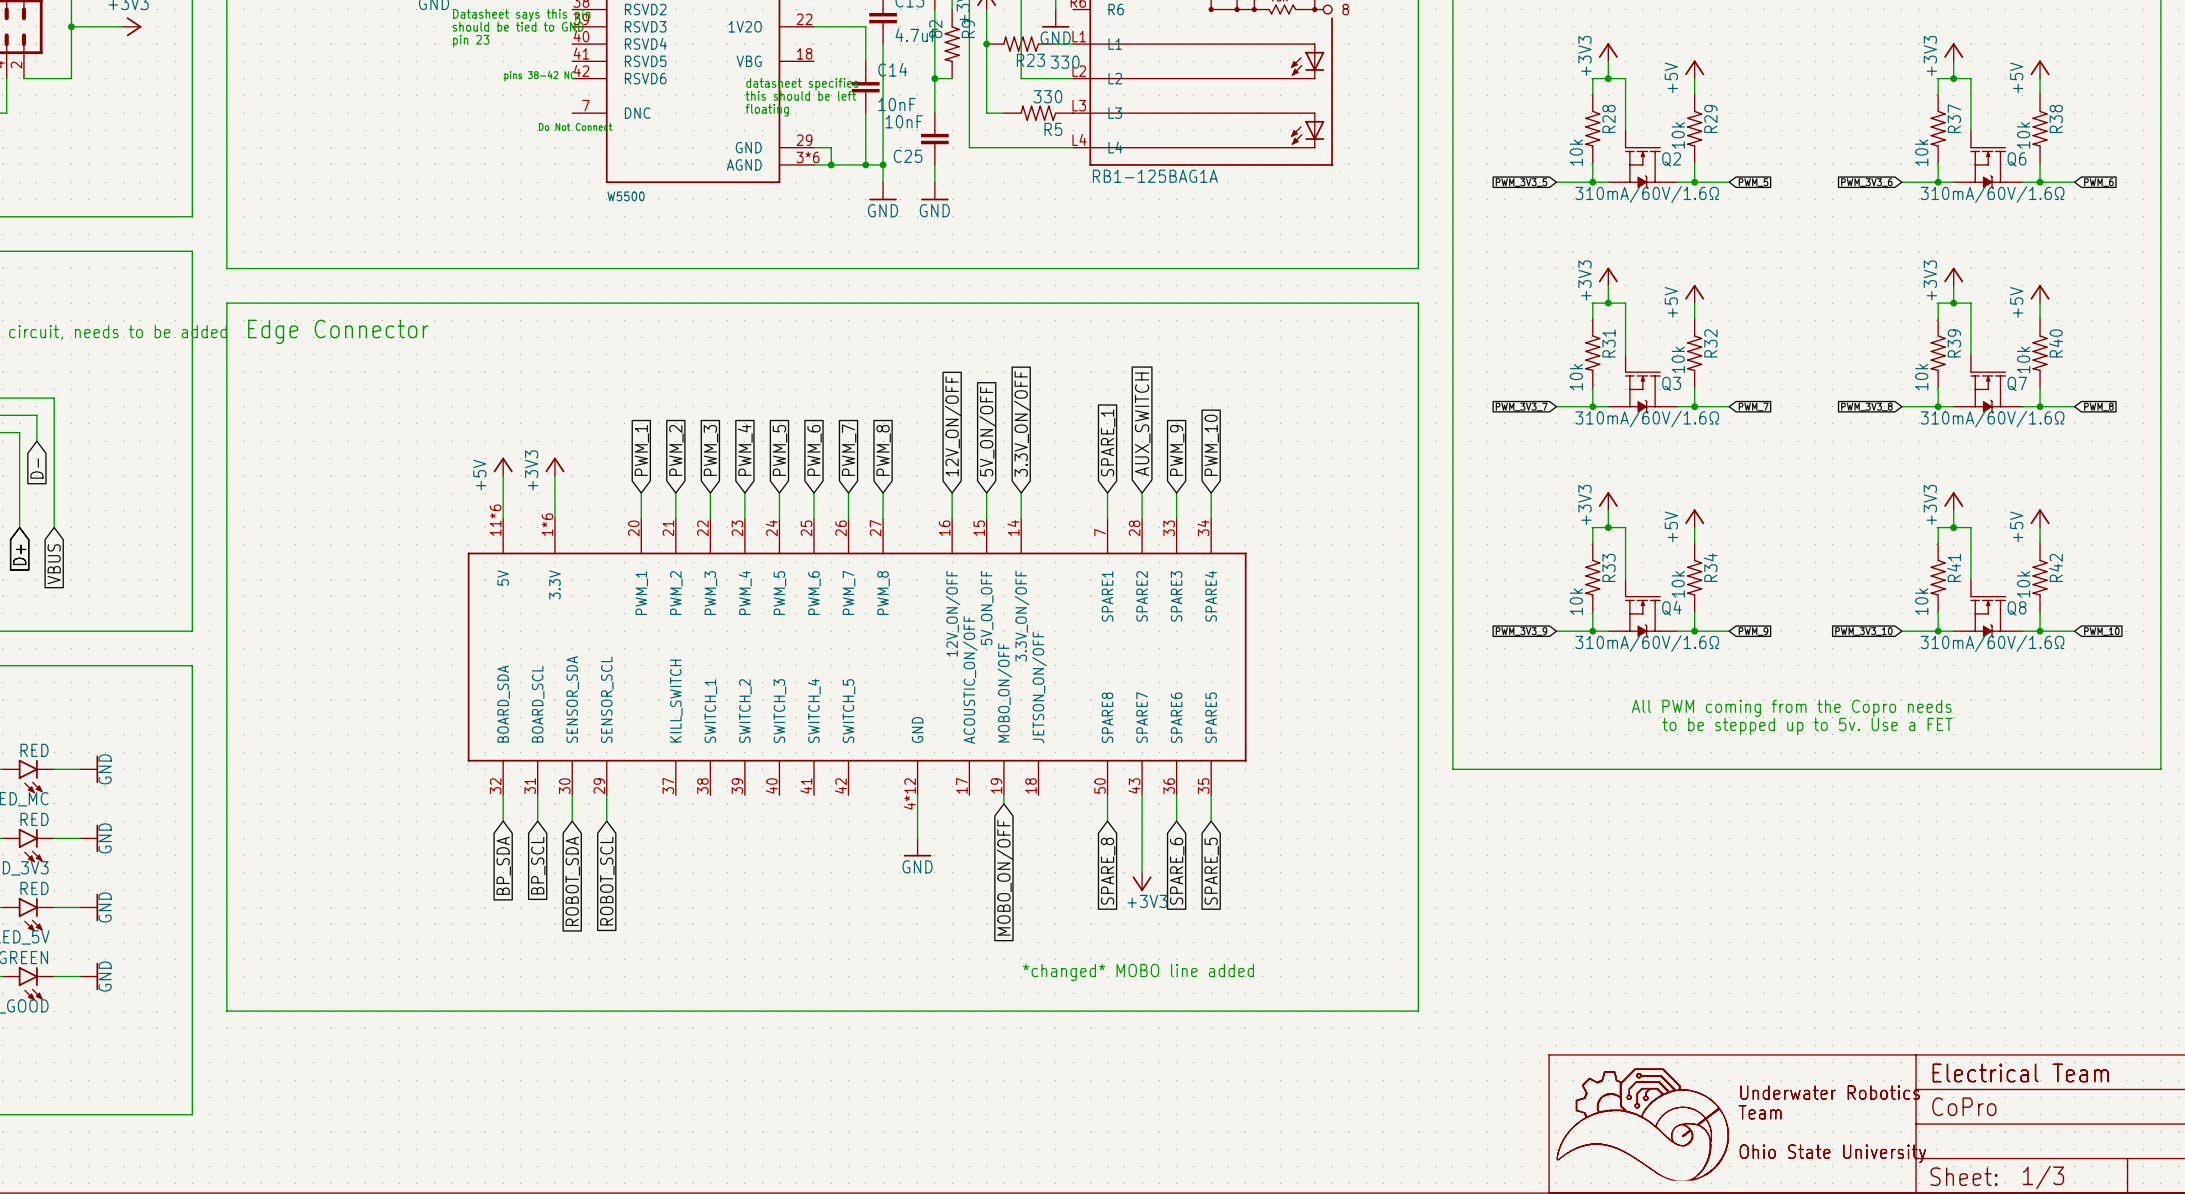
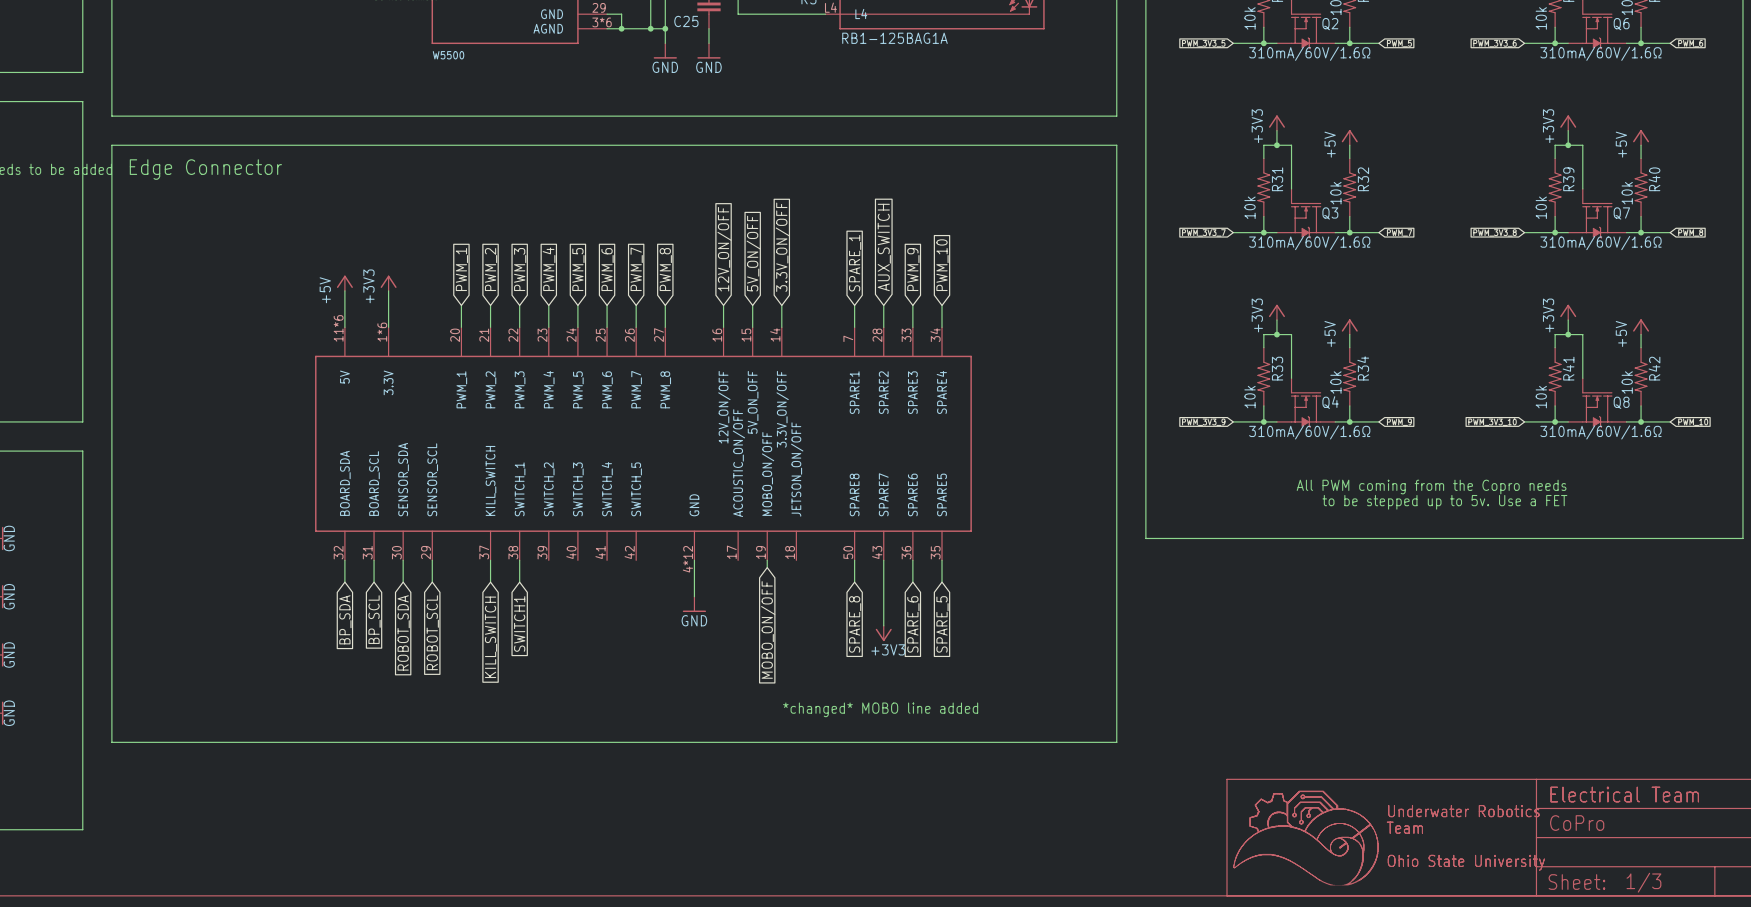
wire: none -> (490, 560) (490, 582)
wire: none -> (519, 560) (519, 582)
global label: none -> SWITCH1 (519, 623)
global label: none -> KILL_SWITCH (491, 637)

